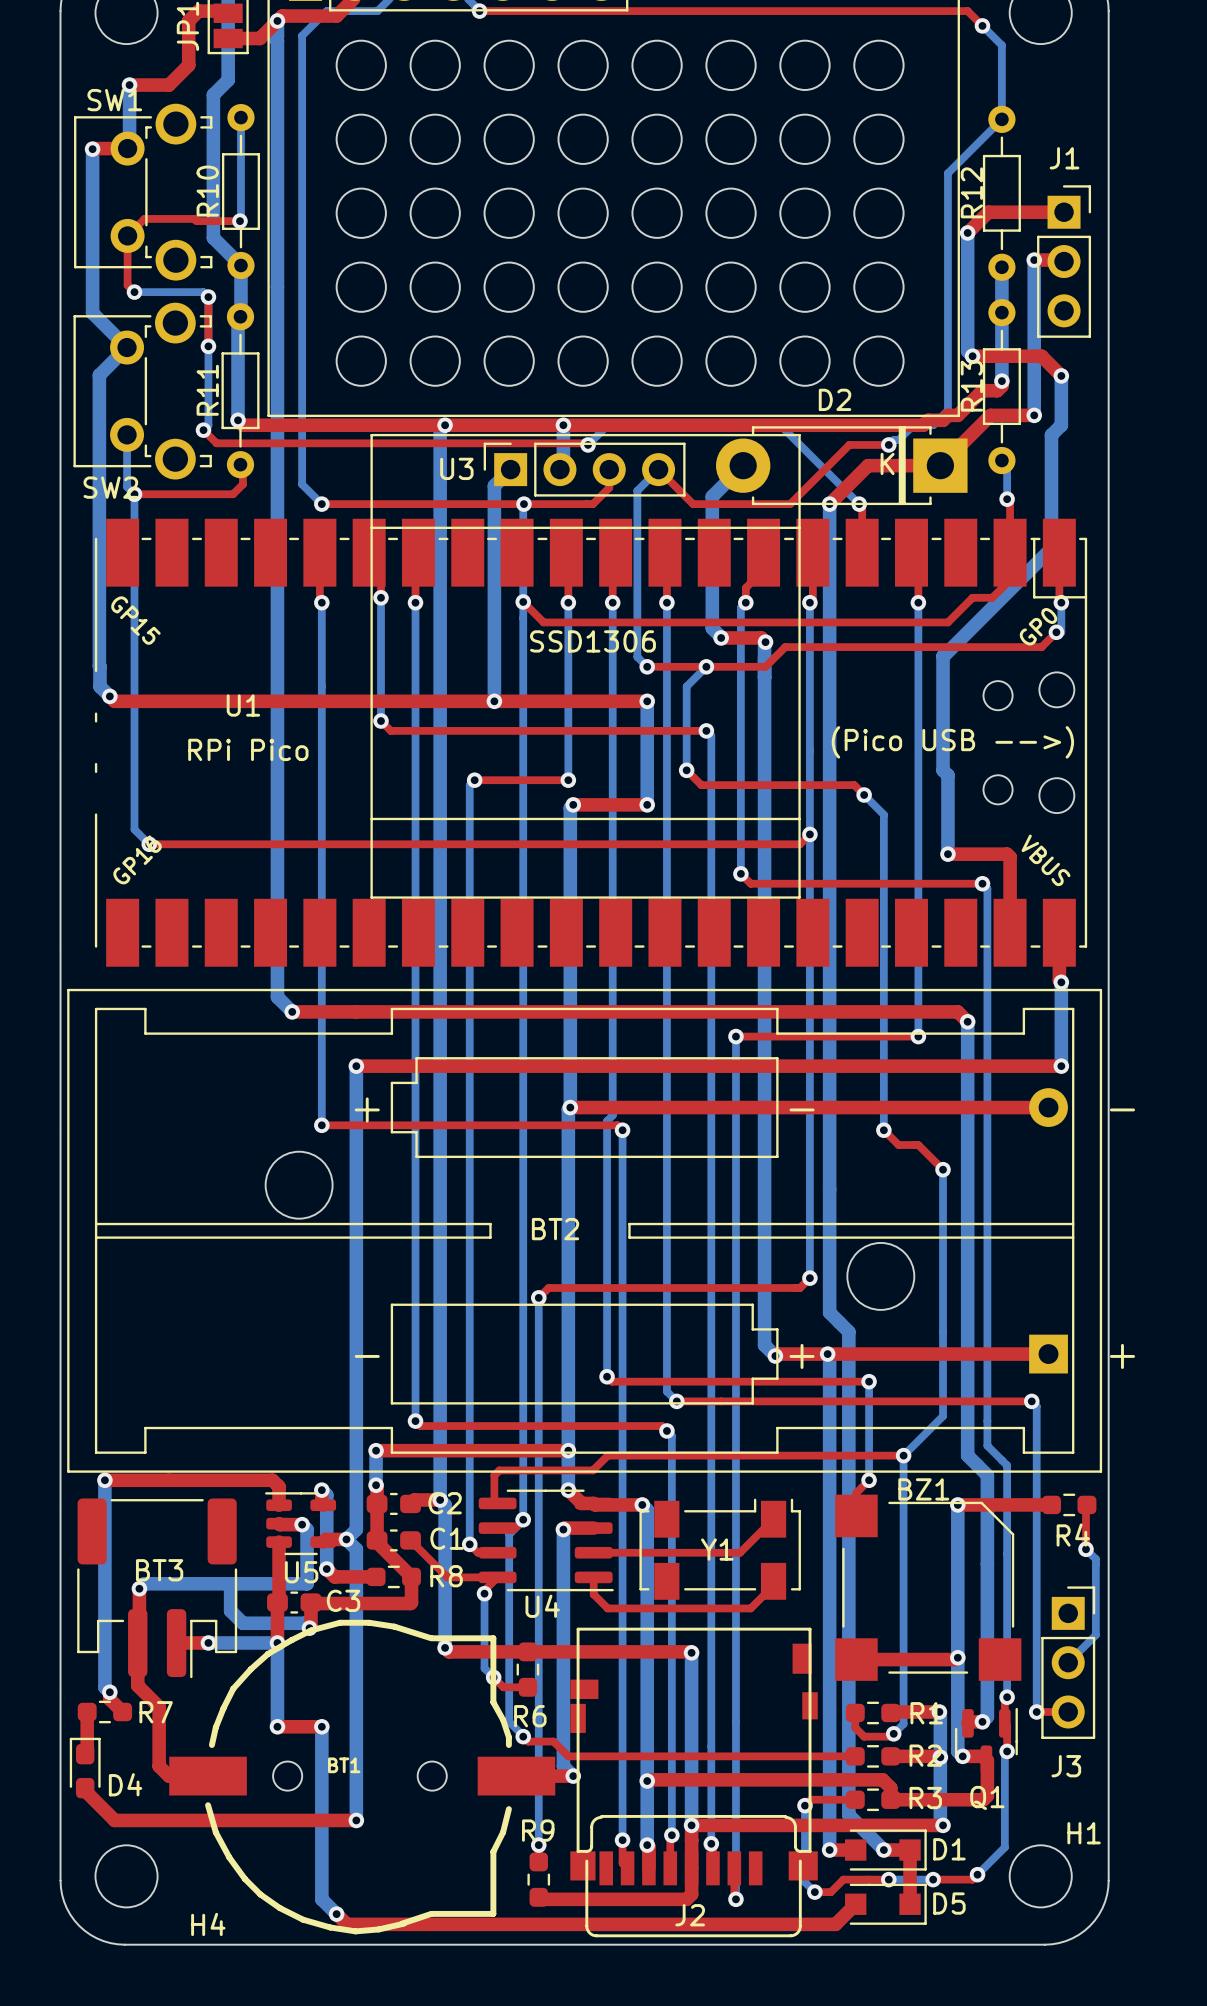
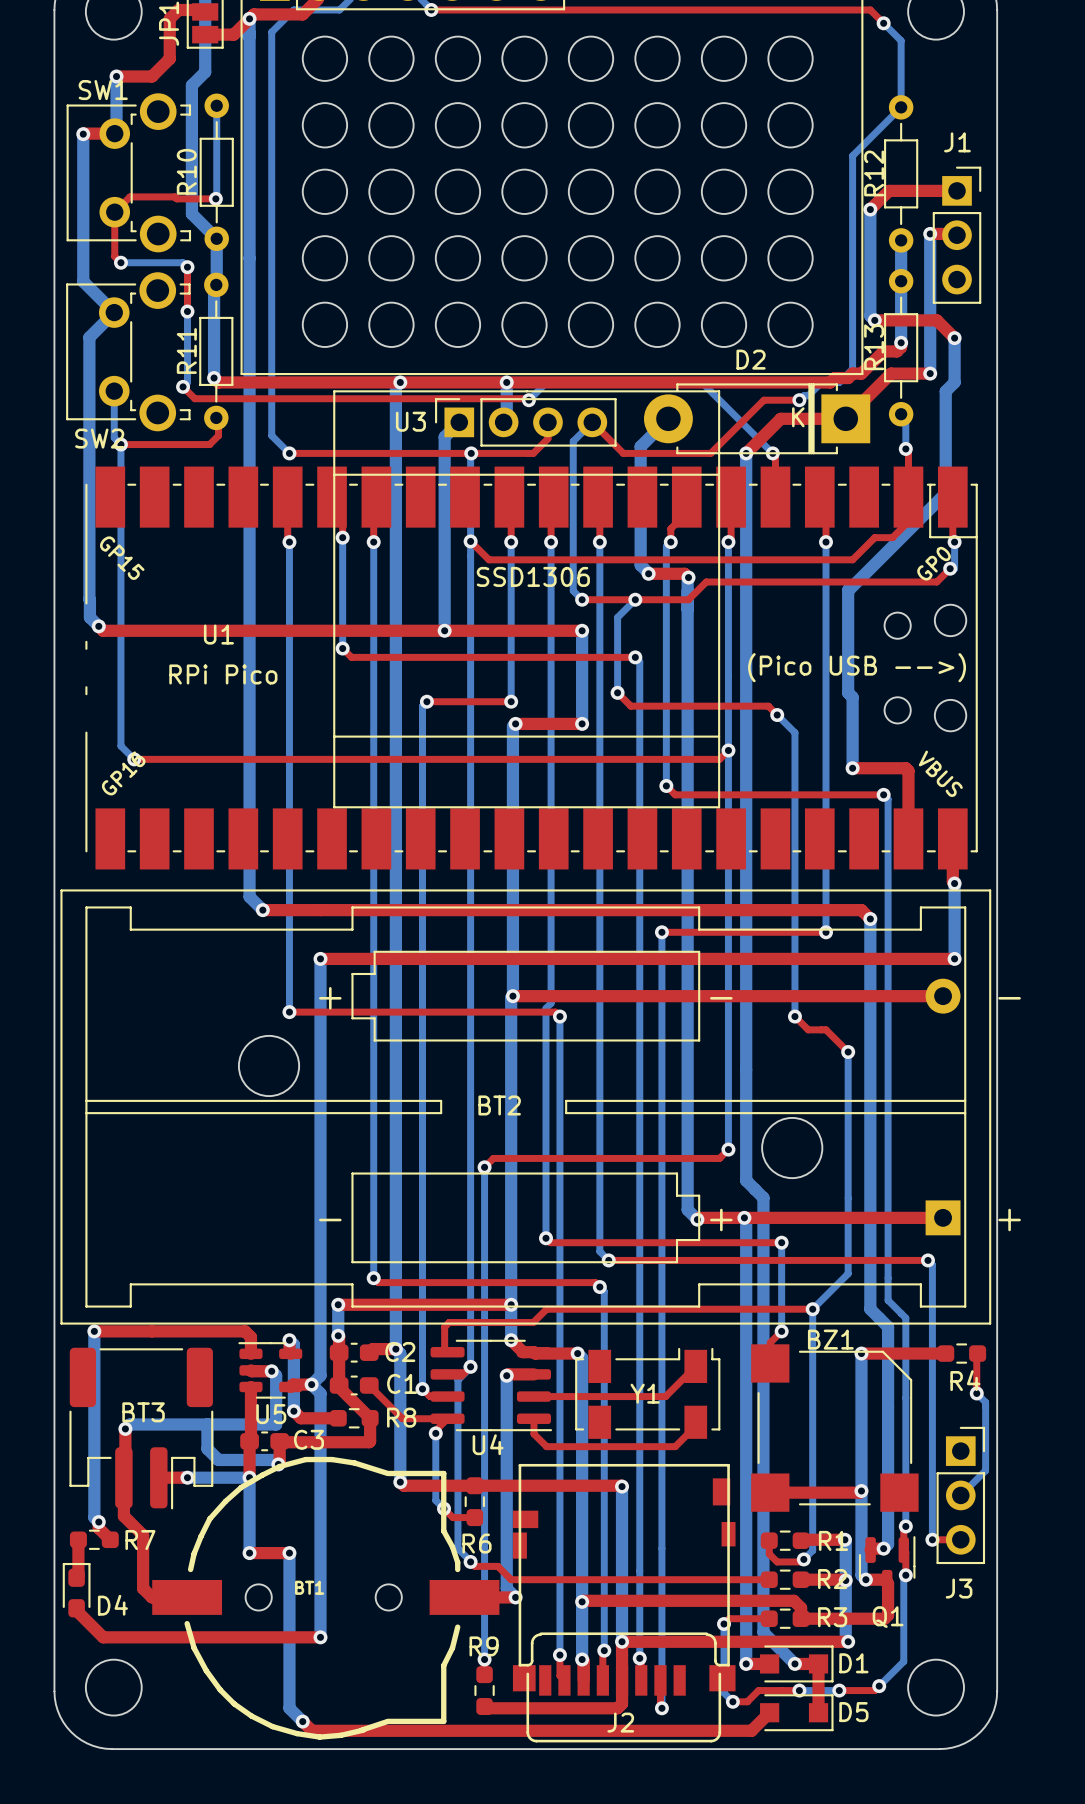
H1 name: H1 (1084, 1833) -> none
H4 name: H4 (208, 1924) -> none

